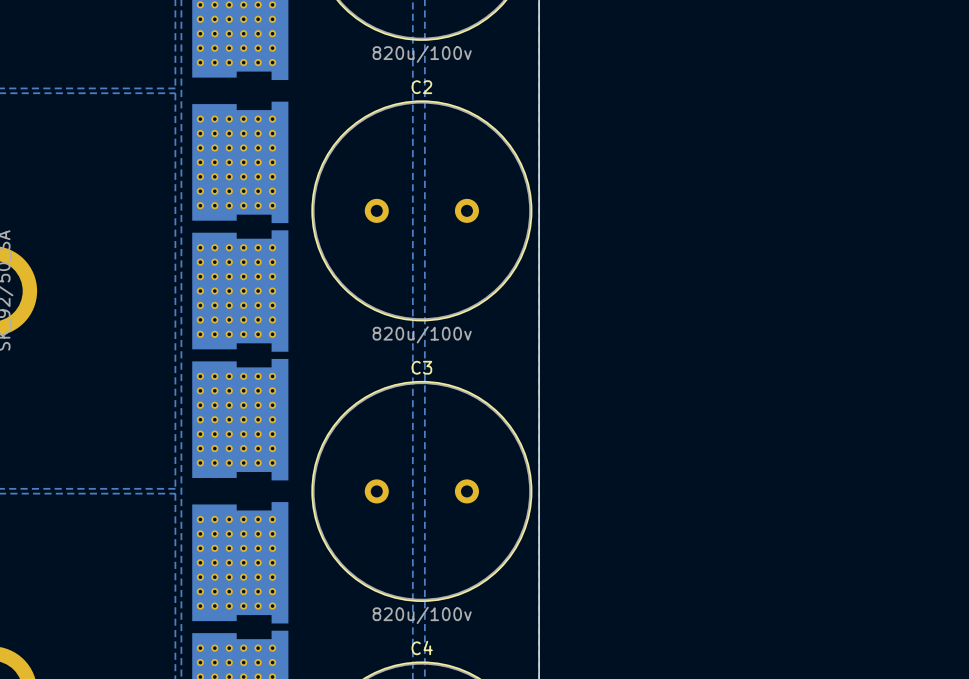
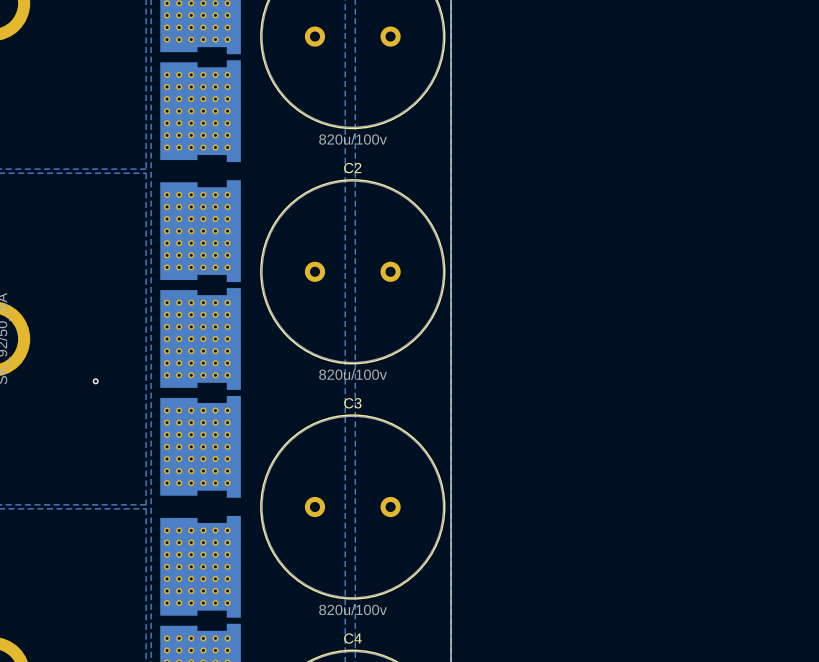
via: none -> (95, 381)

